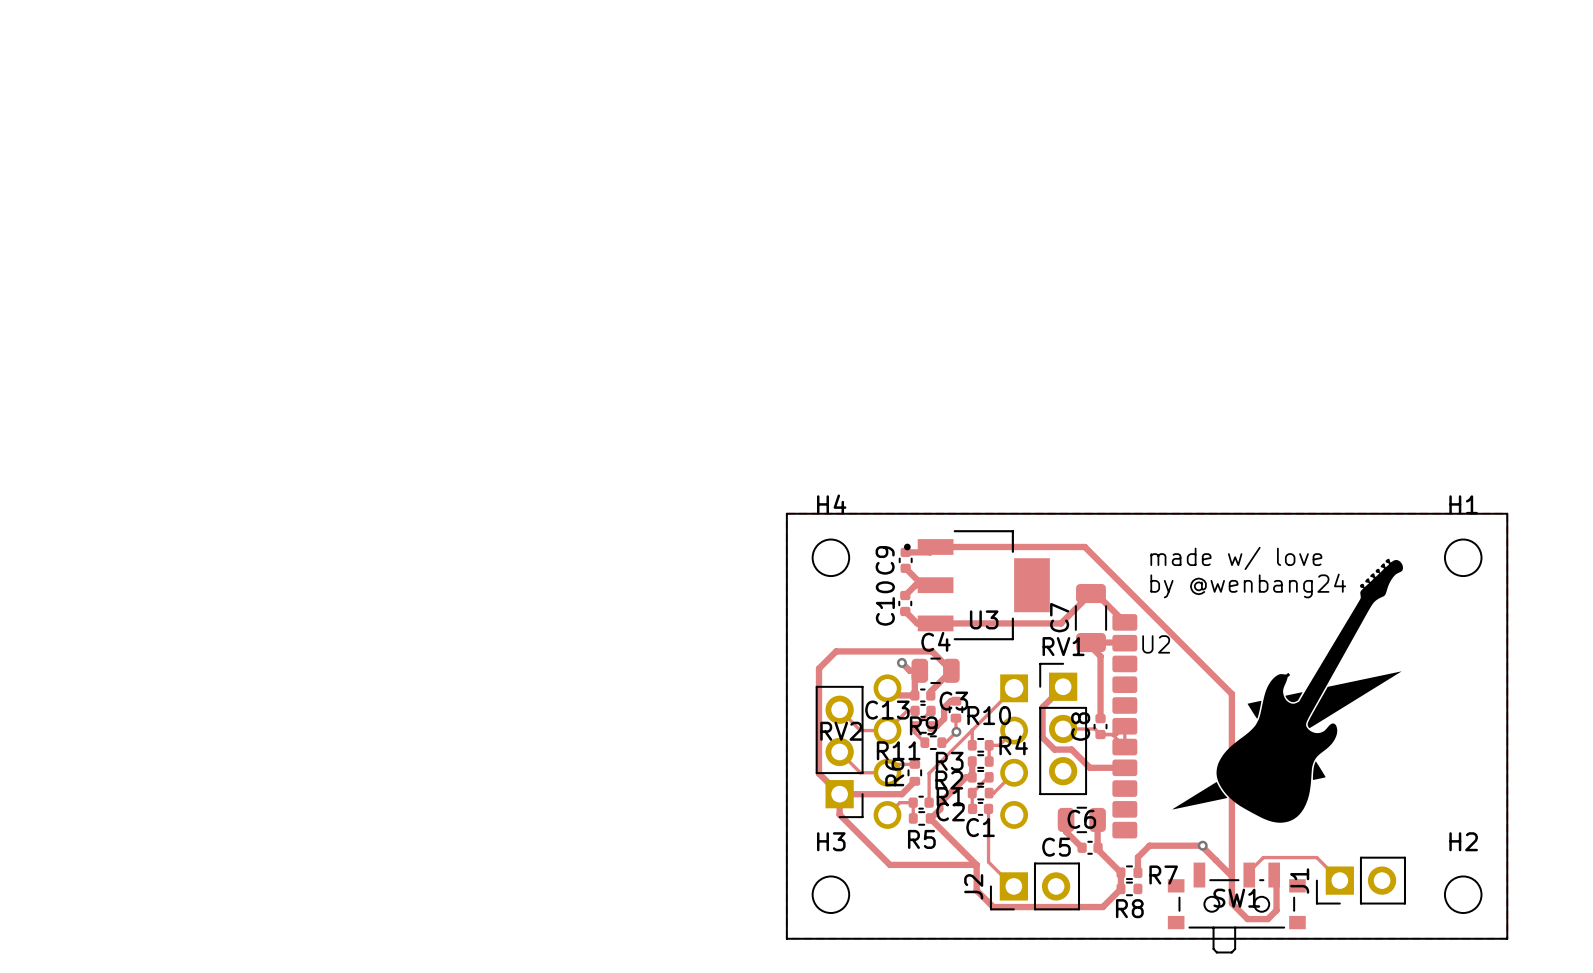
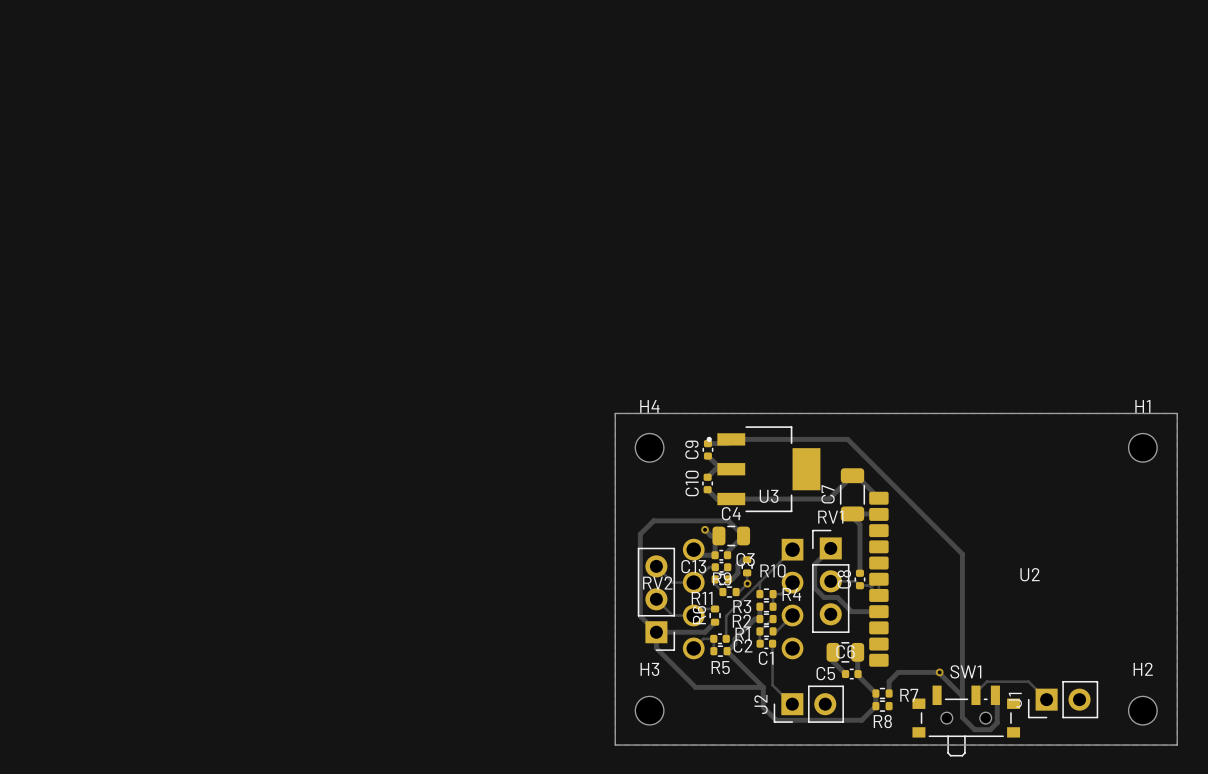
drawing: [1172, 558, 1403, 823] -> none
text: made w/ love (1236, 558) -> none
text: by @wenbang24 (1248, 585) -> none
U2 name position: U2 (1156, 644) -> U2 (1030, 574)
SW1 name position: SW1 (1236, 898) -> SW1 (965, 671)

